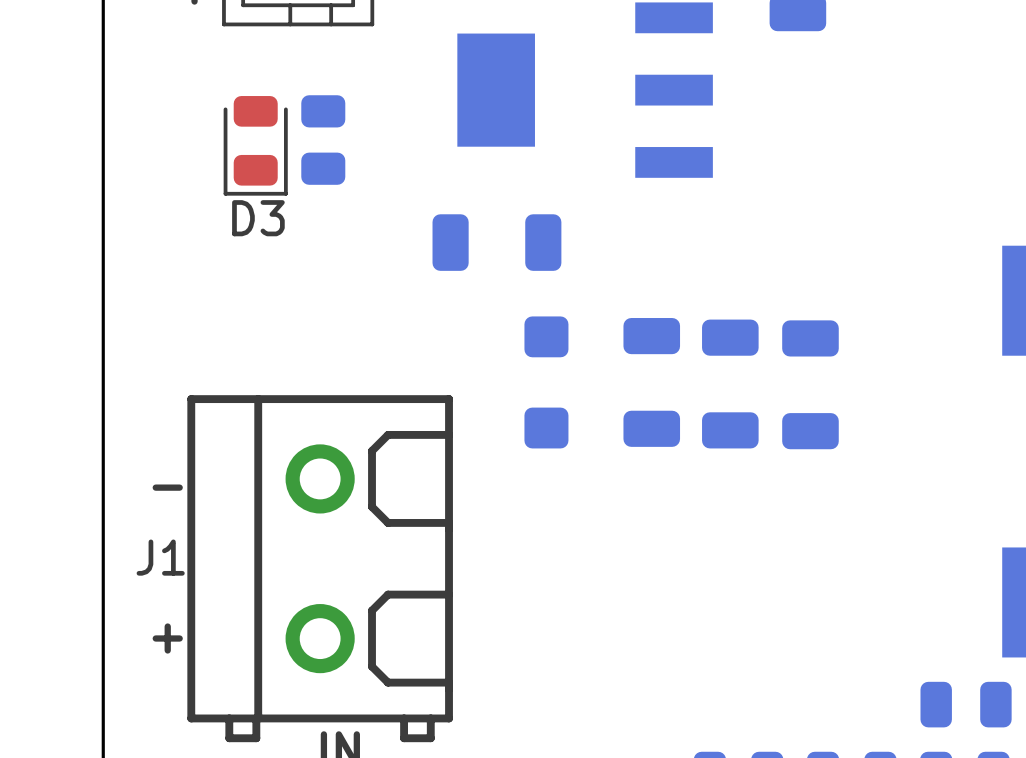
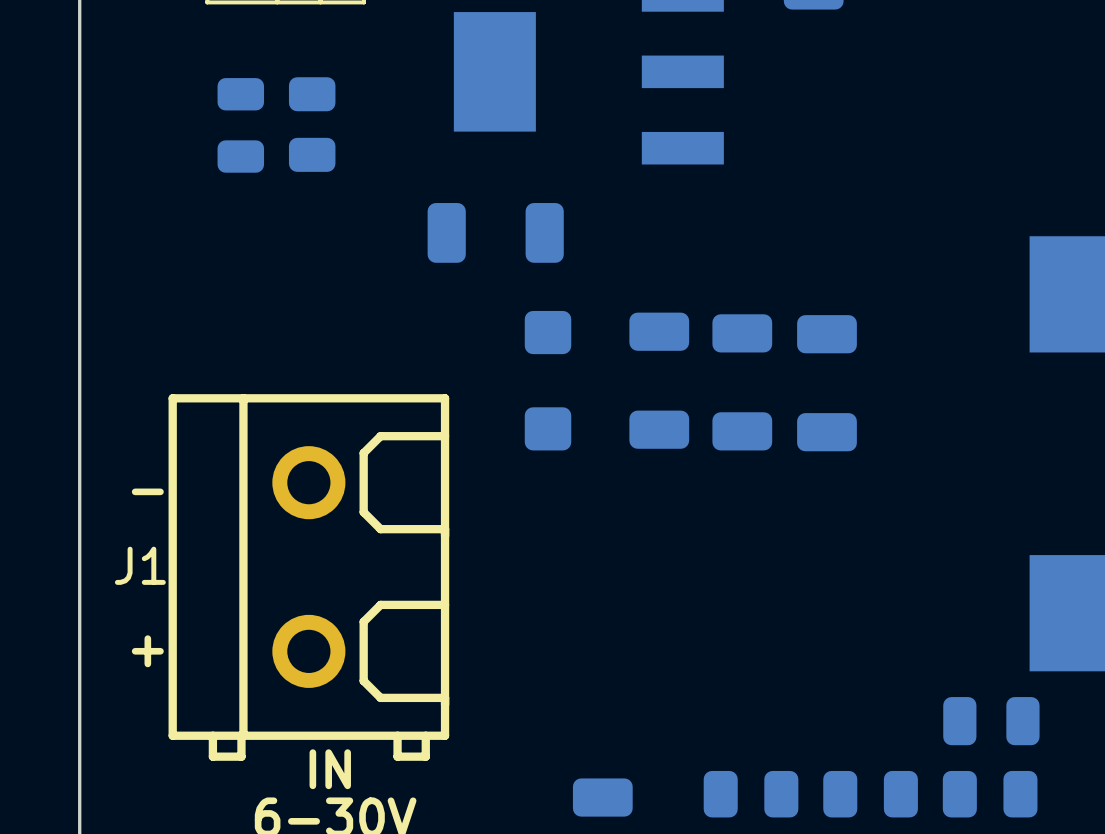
D3 side: top (255, 145) -> bottom (240, 125)

